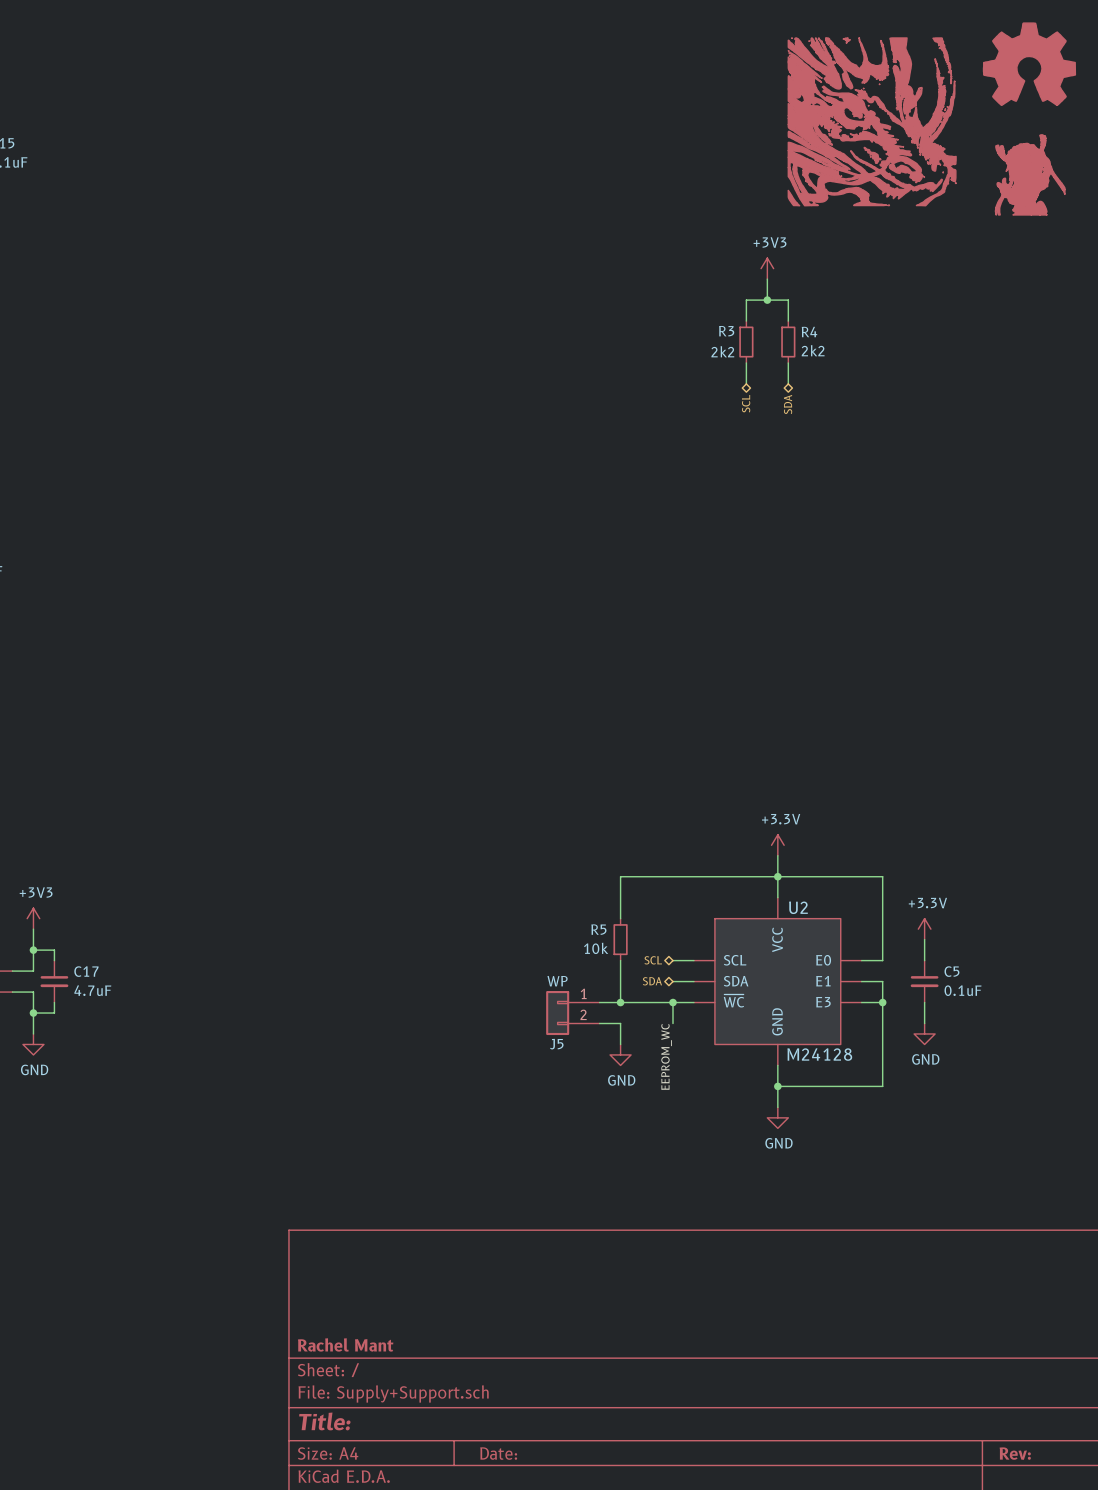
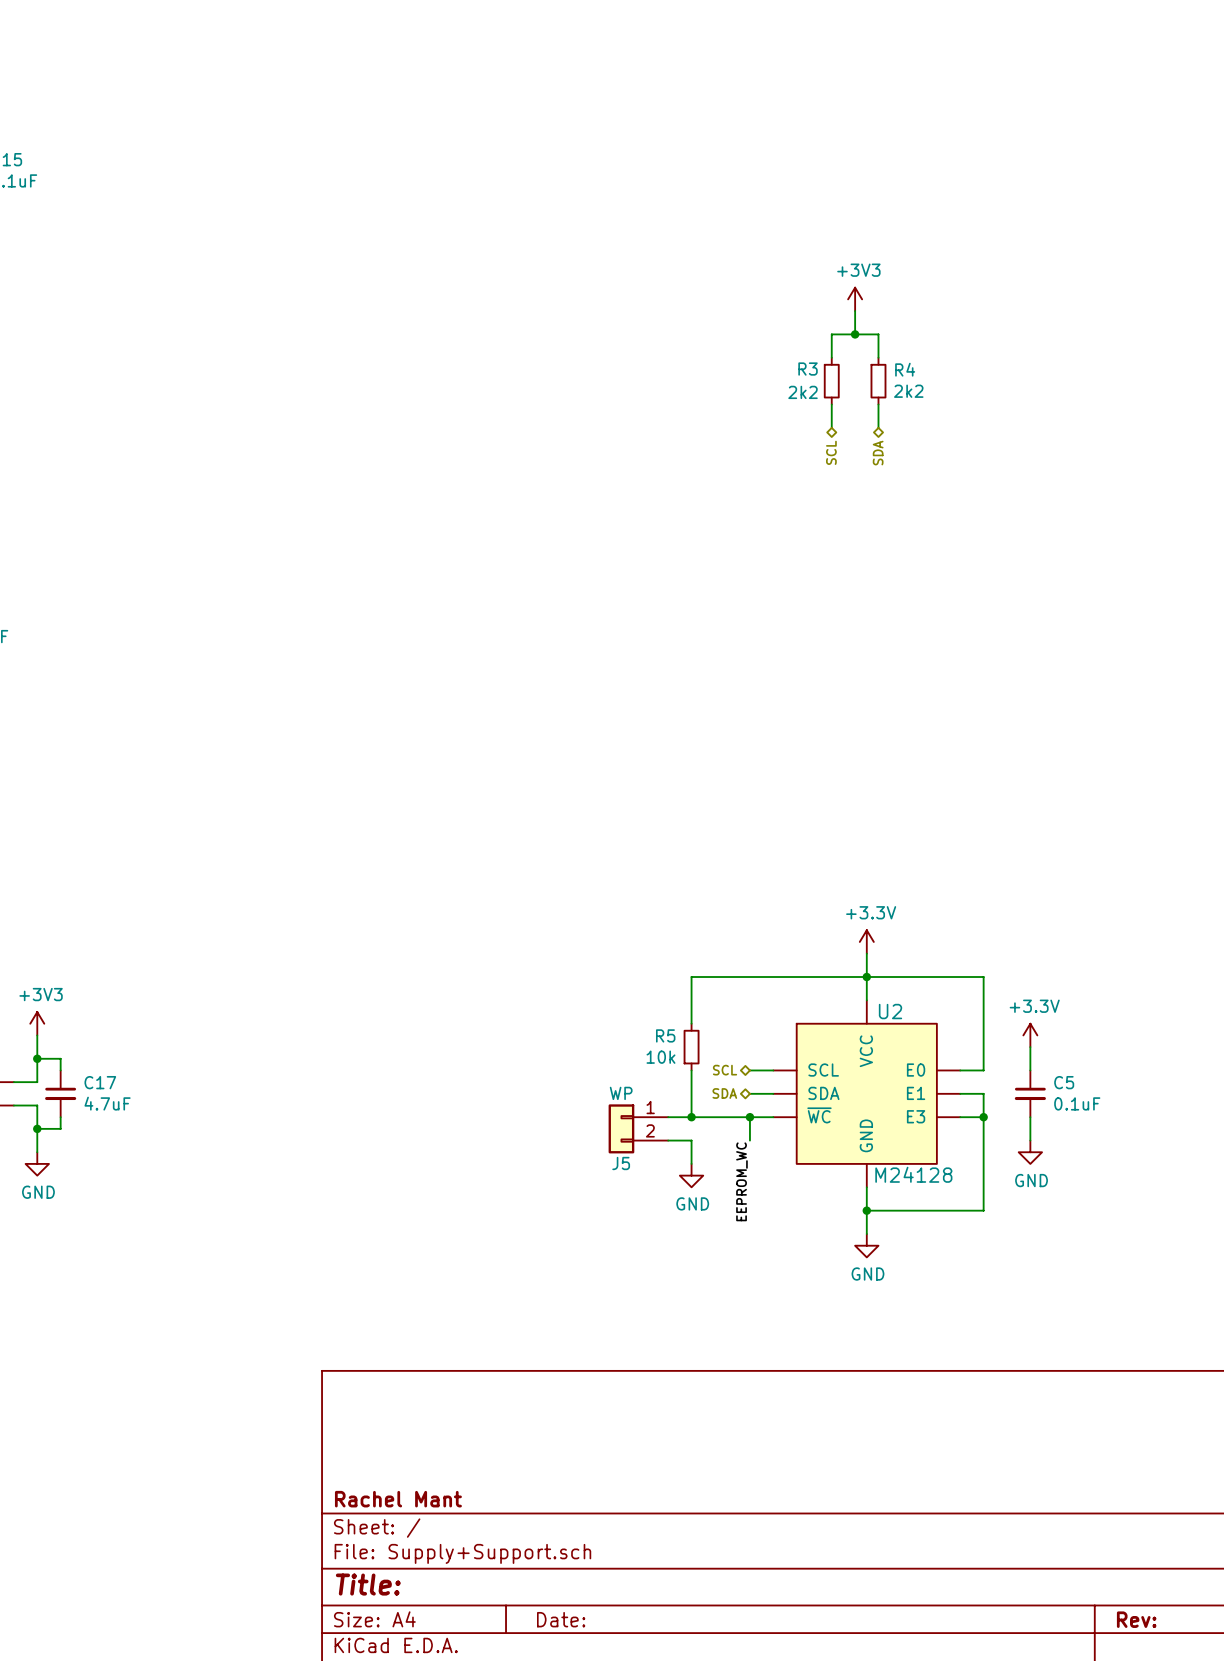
part: (1029, 64) -> none
part: (872, 121) -> none
part: (1030, 174) -> none

